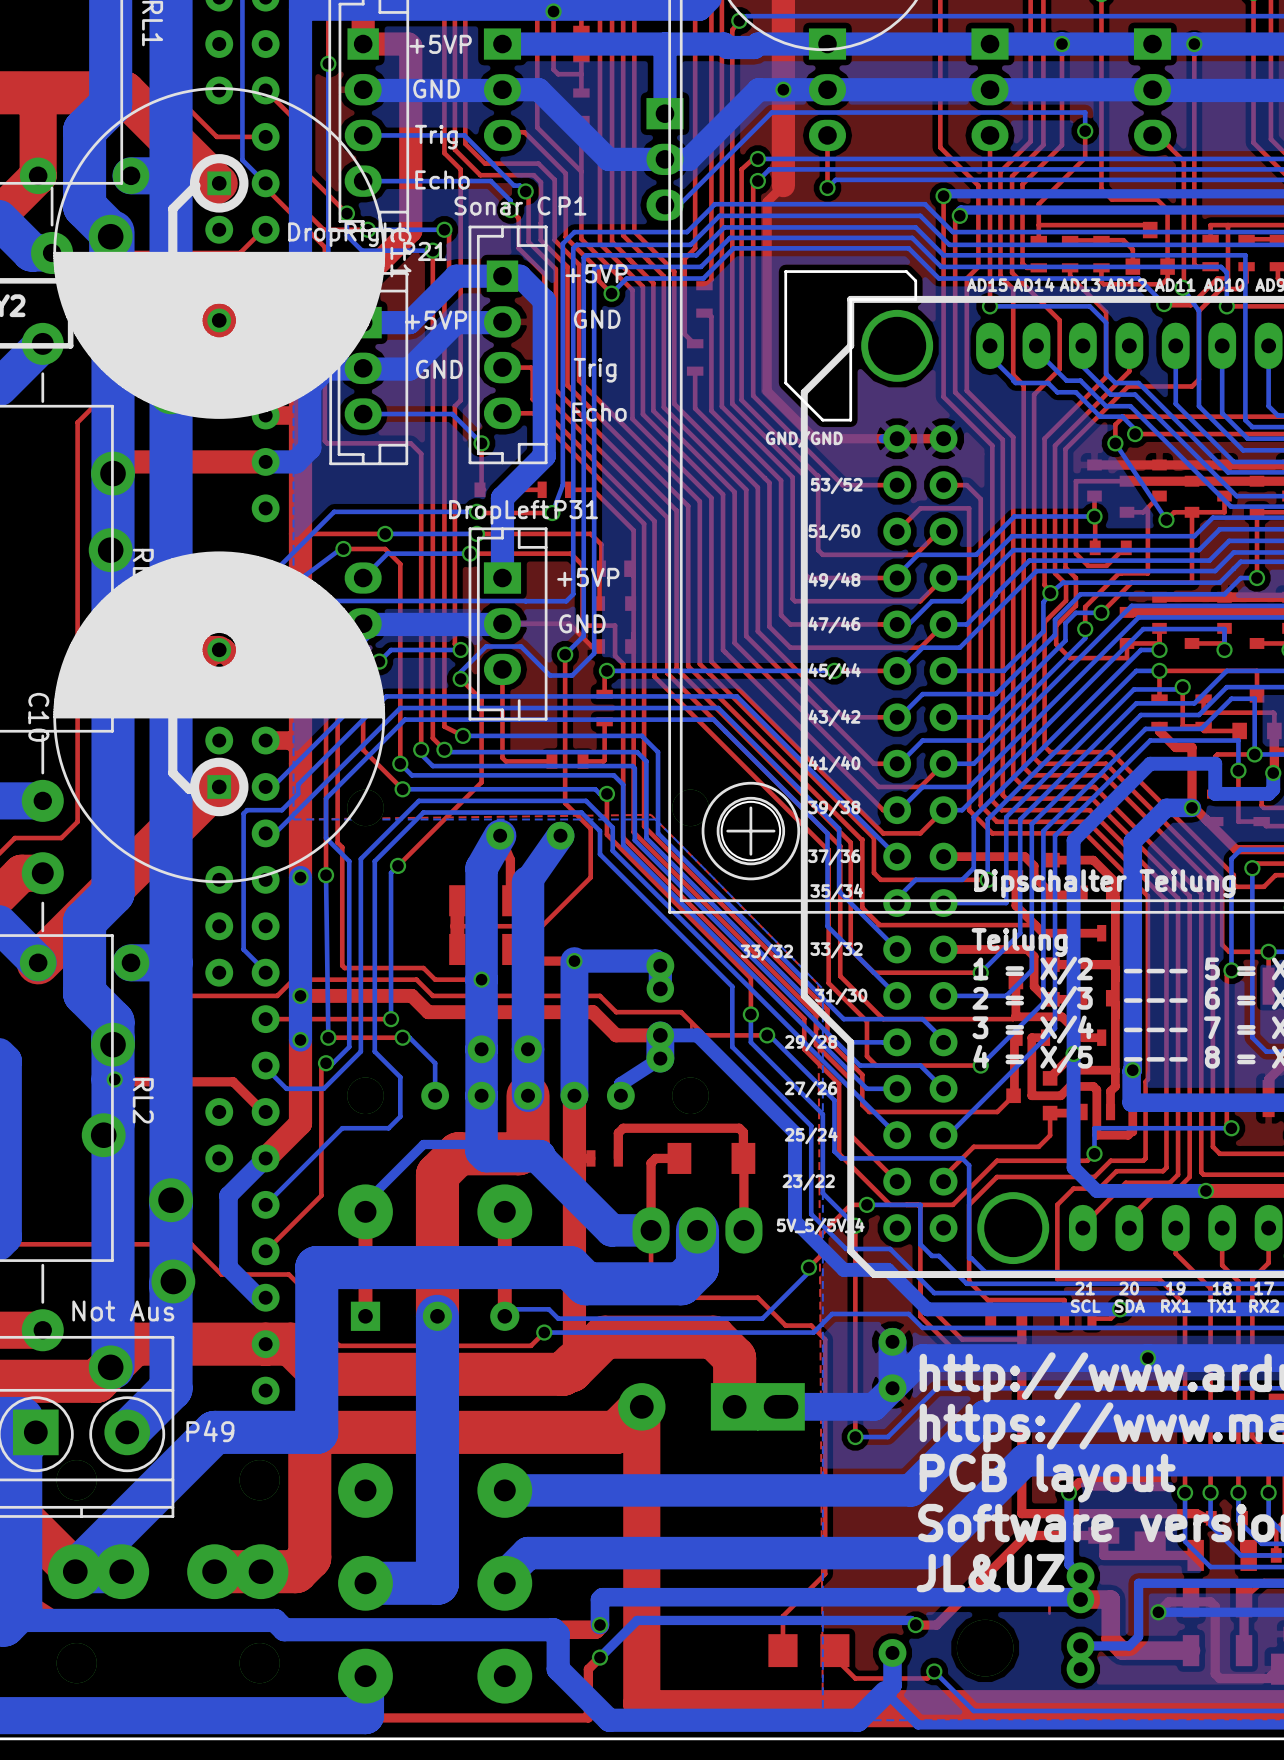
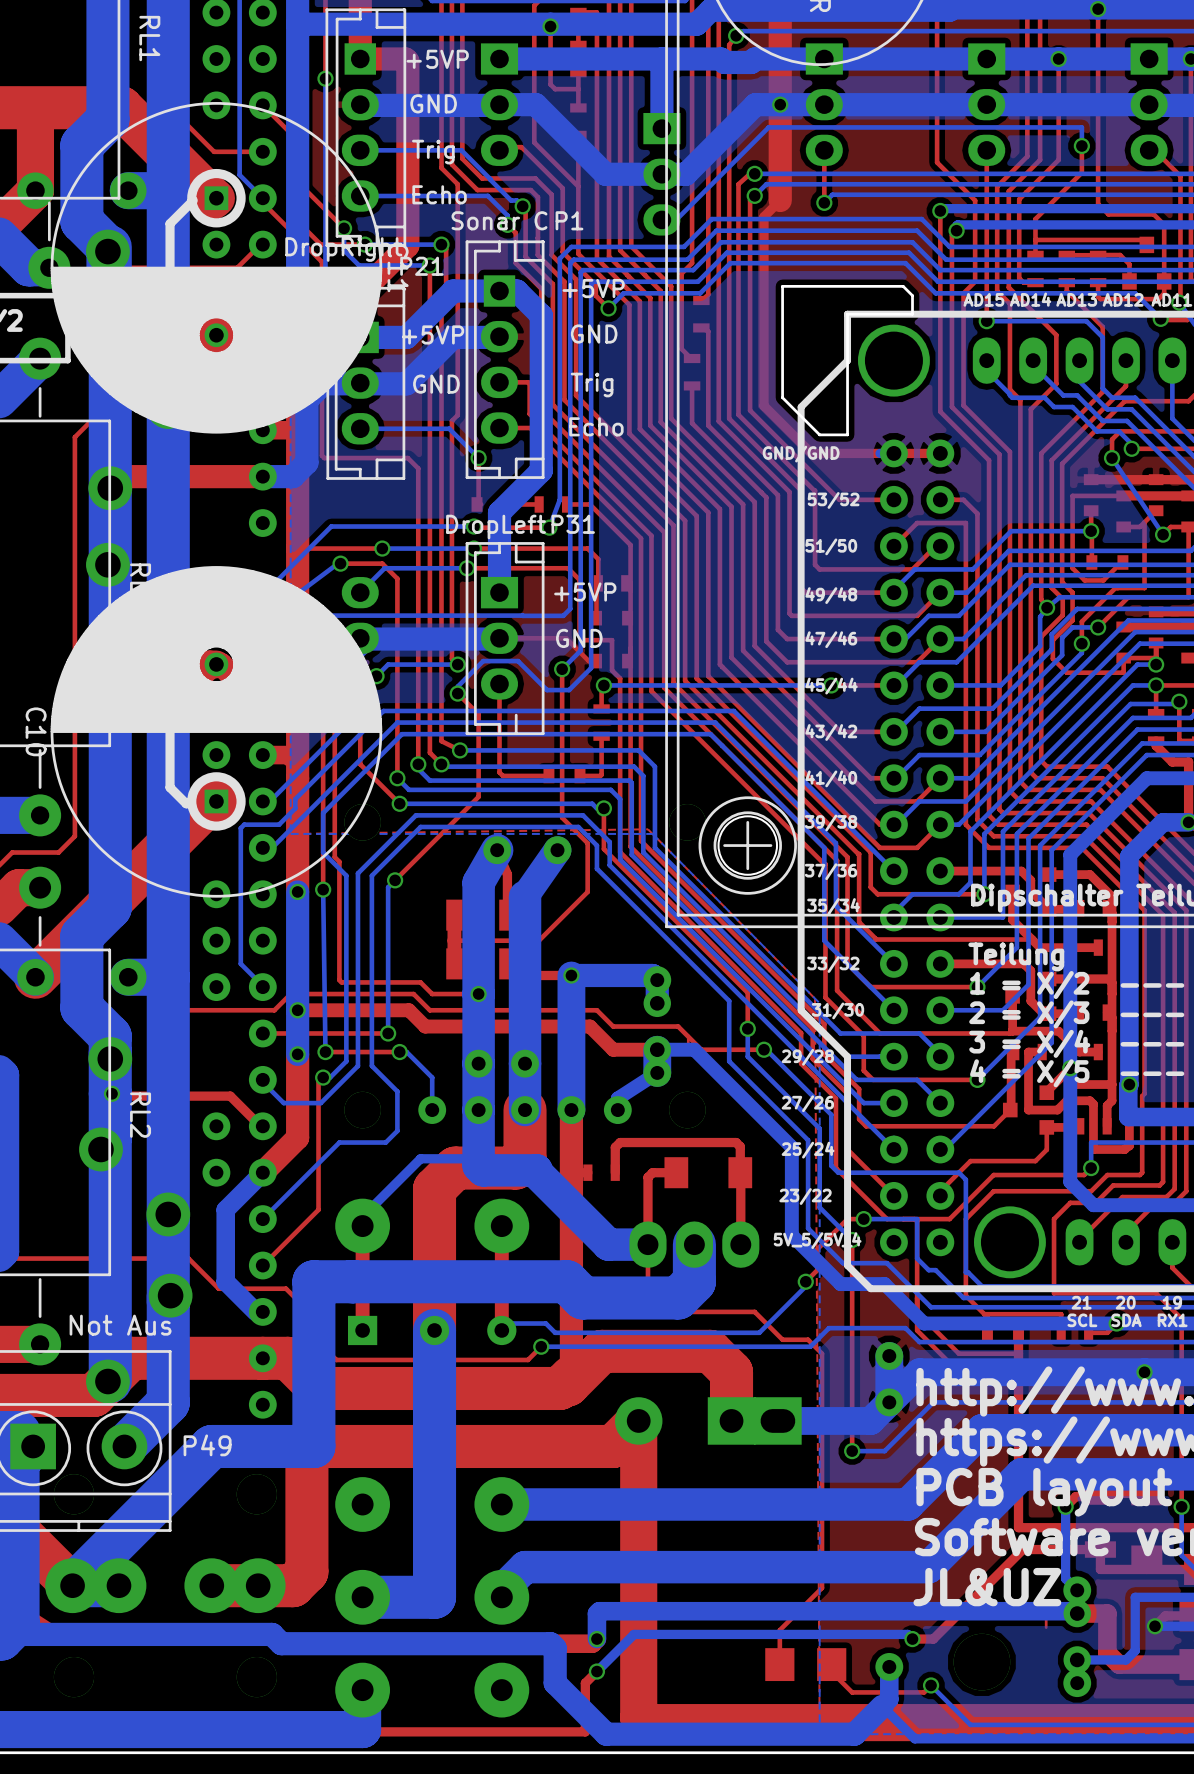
text: 33/32 (766, 952) -> none

